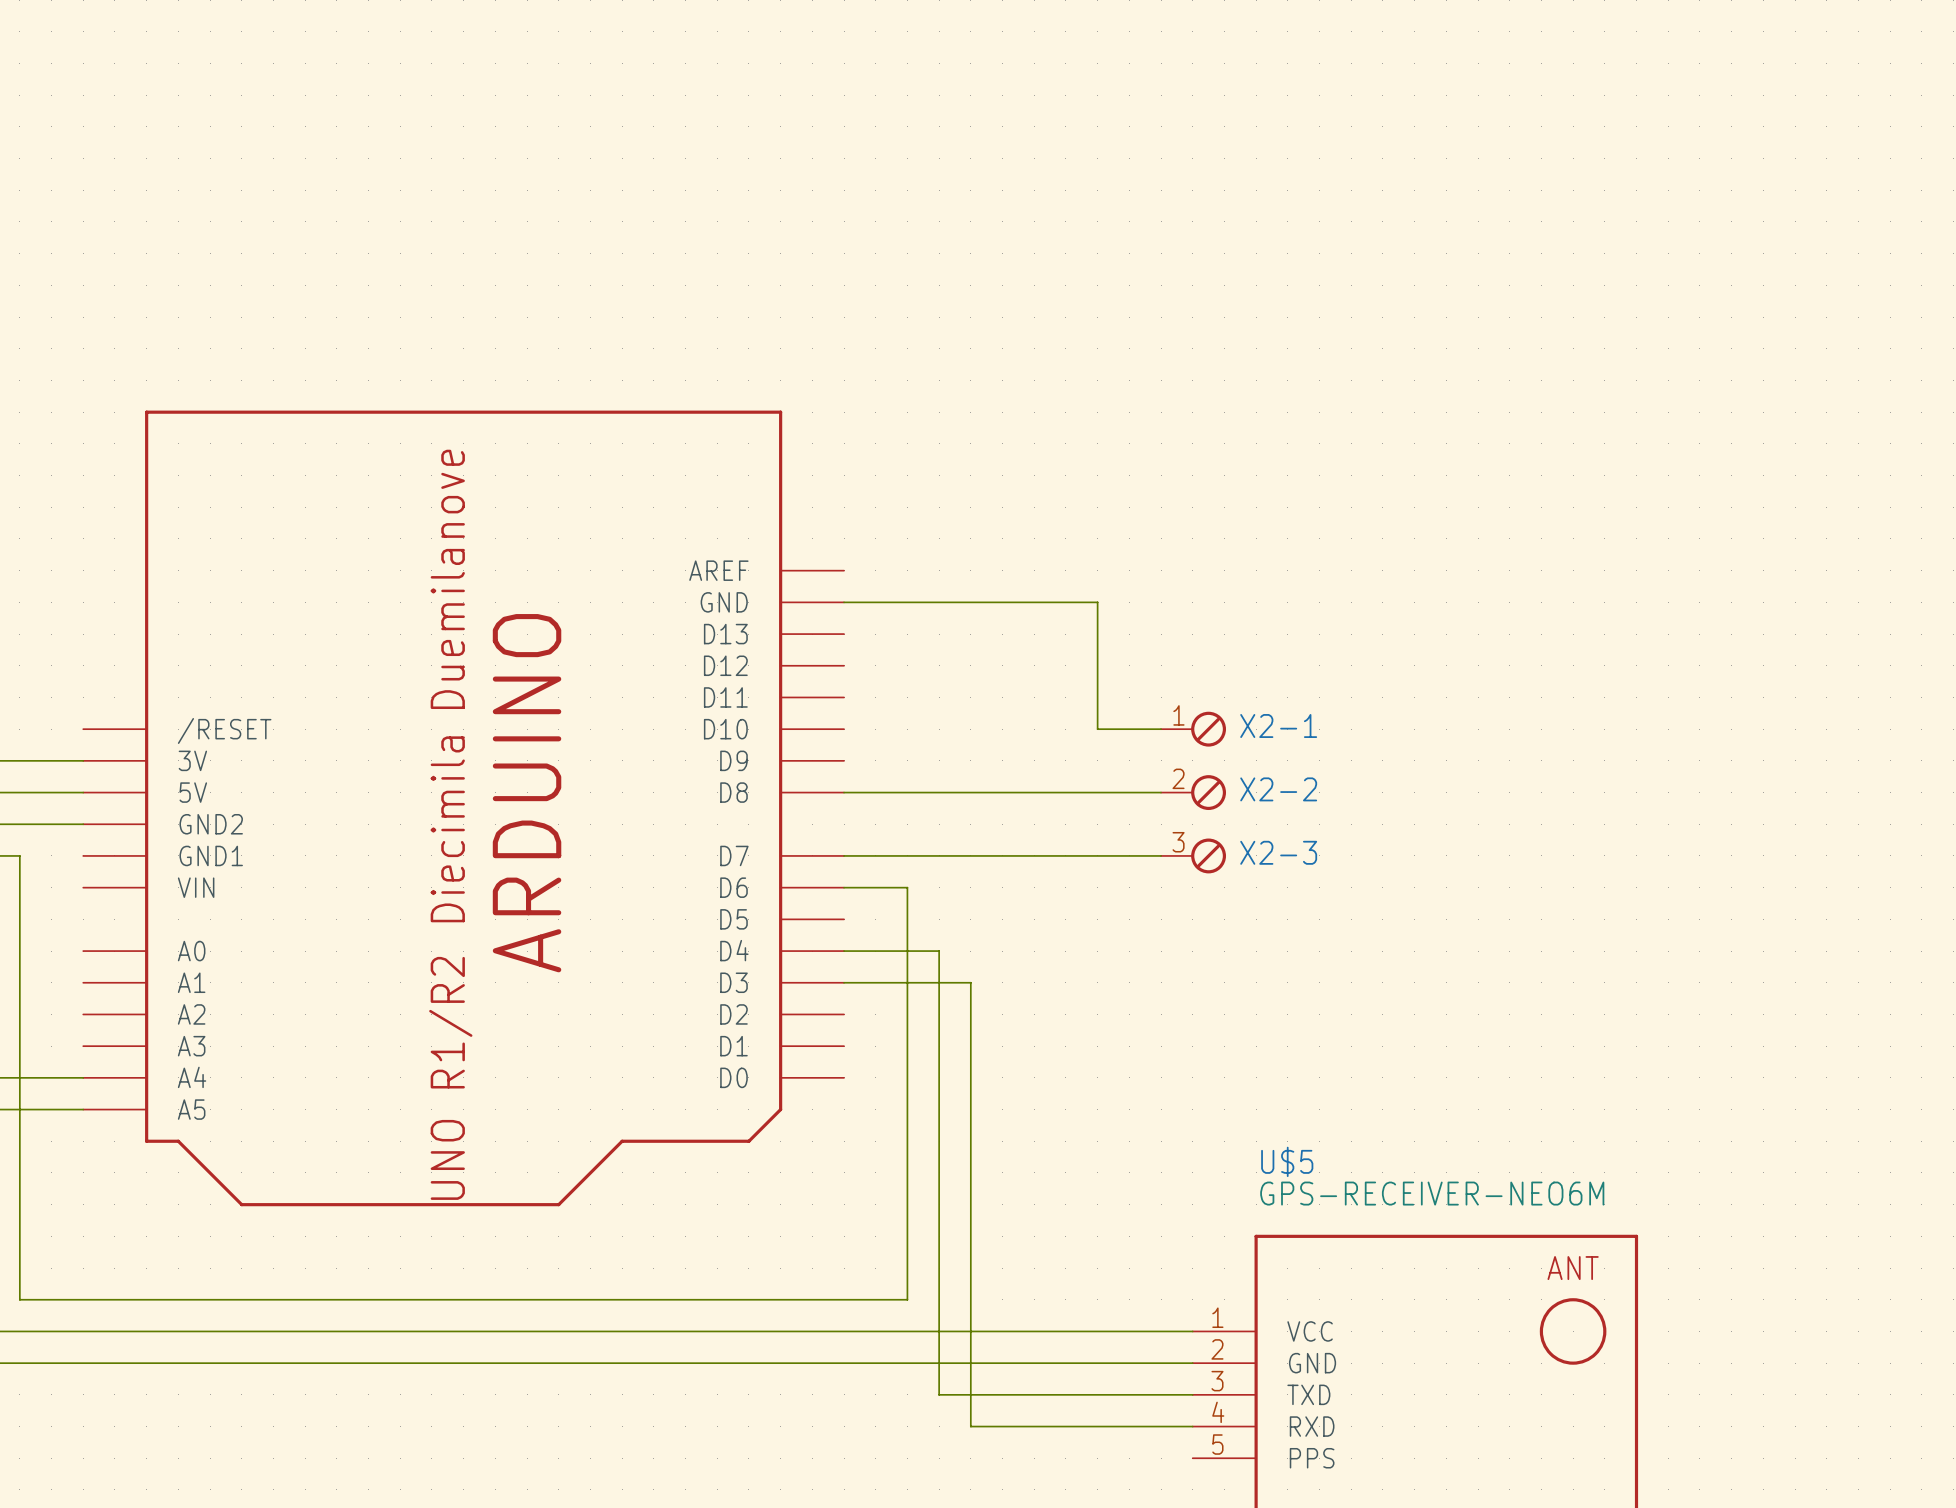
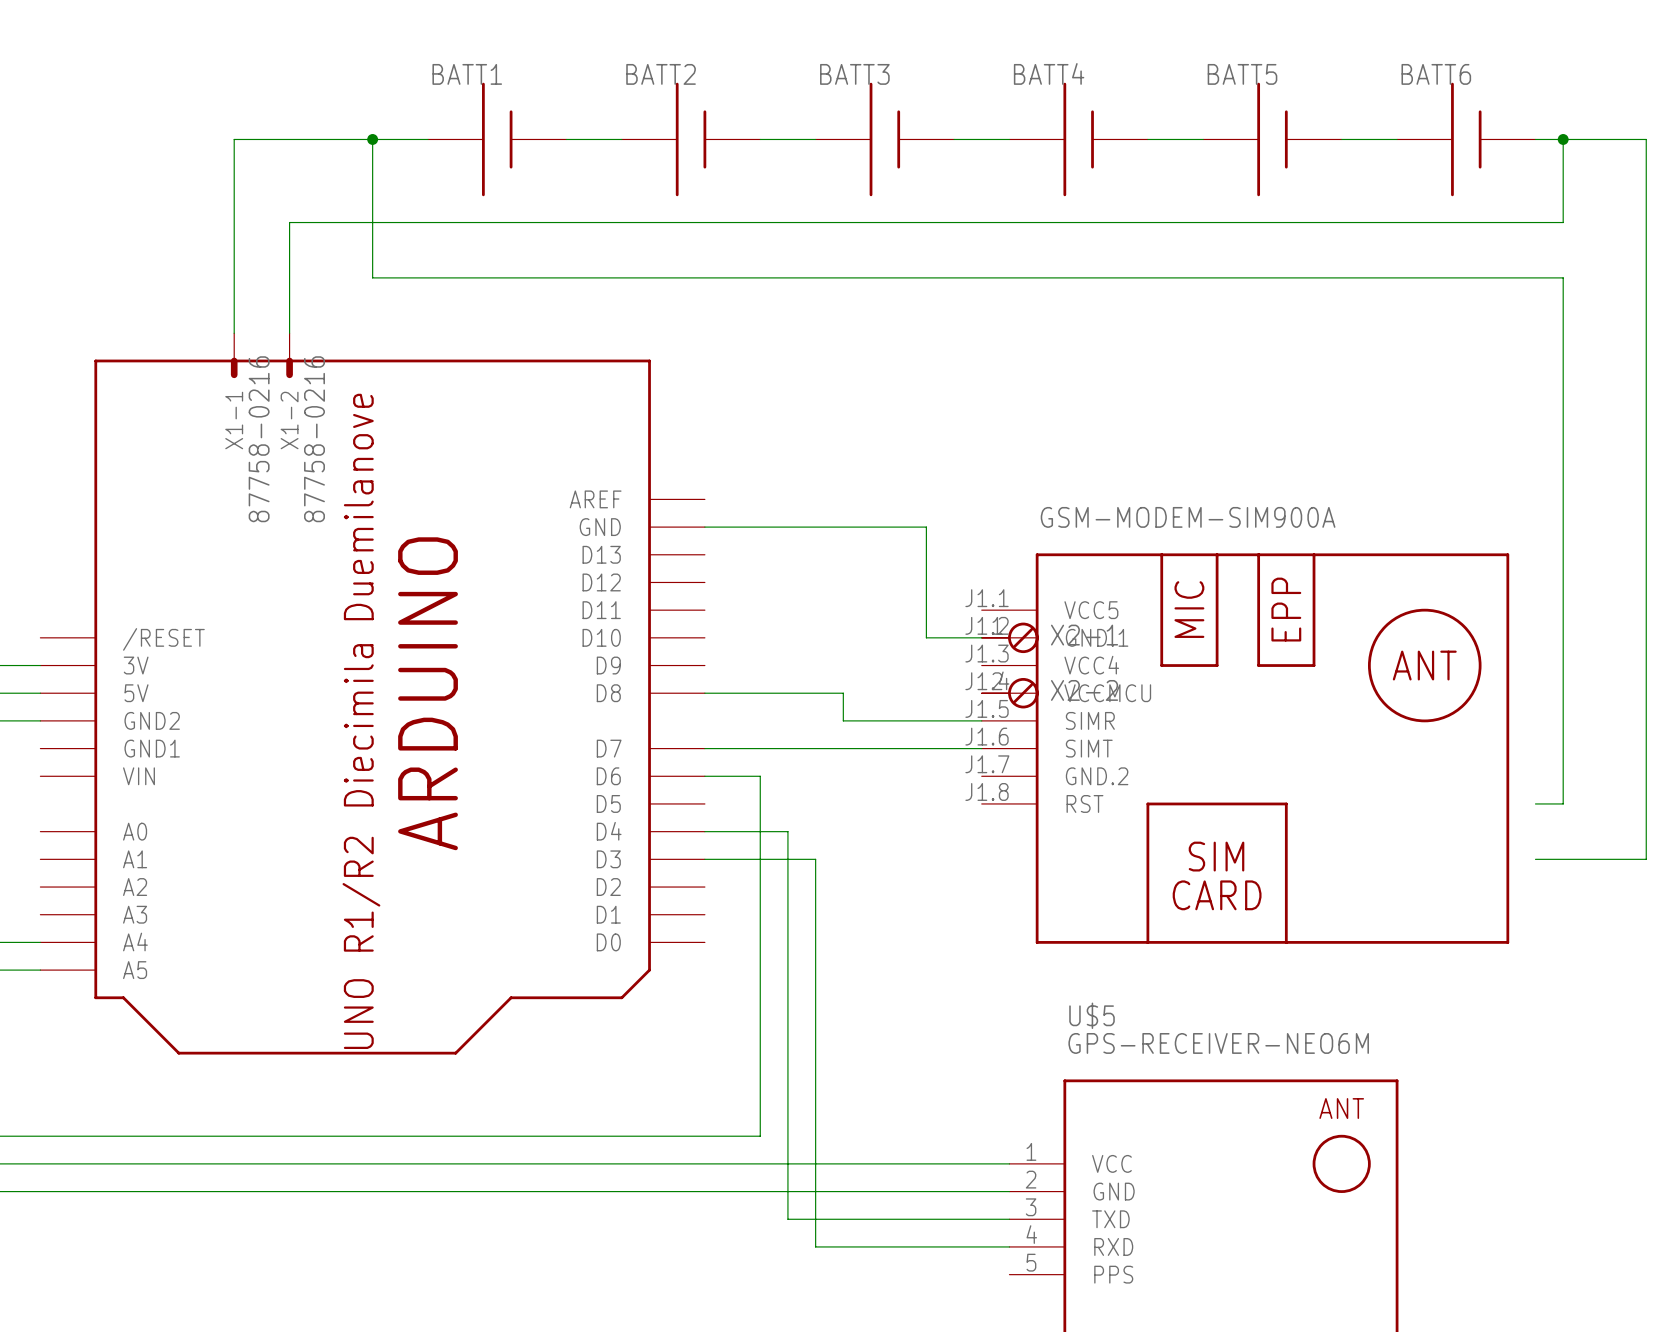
wire: none -> (372, 139) (372, 277) (1563, 277) (1563, 803) (1535, 803)
junction: none -> (372, 139)
wire: none -> (428, 139) (234, 139) (234, 333)
BATT1: none -> (497, 139)
wire: none -> (566, 139) (621, 139)
BATT2: none -> (691, 139)
wire: none -> (760, 139) (815, 139)
BATT3: none -> (884, 139)
wire: none -> (954, 139) (1009, 139)
BATT4: none -> (1078, 139)
wire: none -> (1147, 139) (1203, 139)
BATT5: none -> (1272, 139)
wire: none -> (1341, 139) (1397, 139)
BATT6: none -> (1466, 139)
wire: none -> (1535, 139) (1646, 139) (1646, 859) (1535, 859)
wire: none -> (1563, 139) (1563, 222) (289, 222) (289, 333)
junction: none -> (1563, 139)
X1-1: none -> 87758-0216 (234, 355)
X1-2: none -> 87758-0216 (289, 355)
wire: (1002, 792) (1161, 792) -> (843, 693) (843, 720) (981, 720)
X2-3: (1193, 855) -> none
part: none -> GSM-MODEM-SIM900A (1245, 748)

